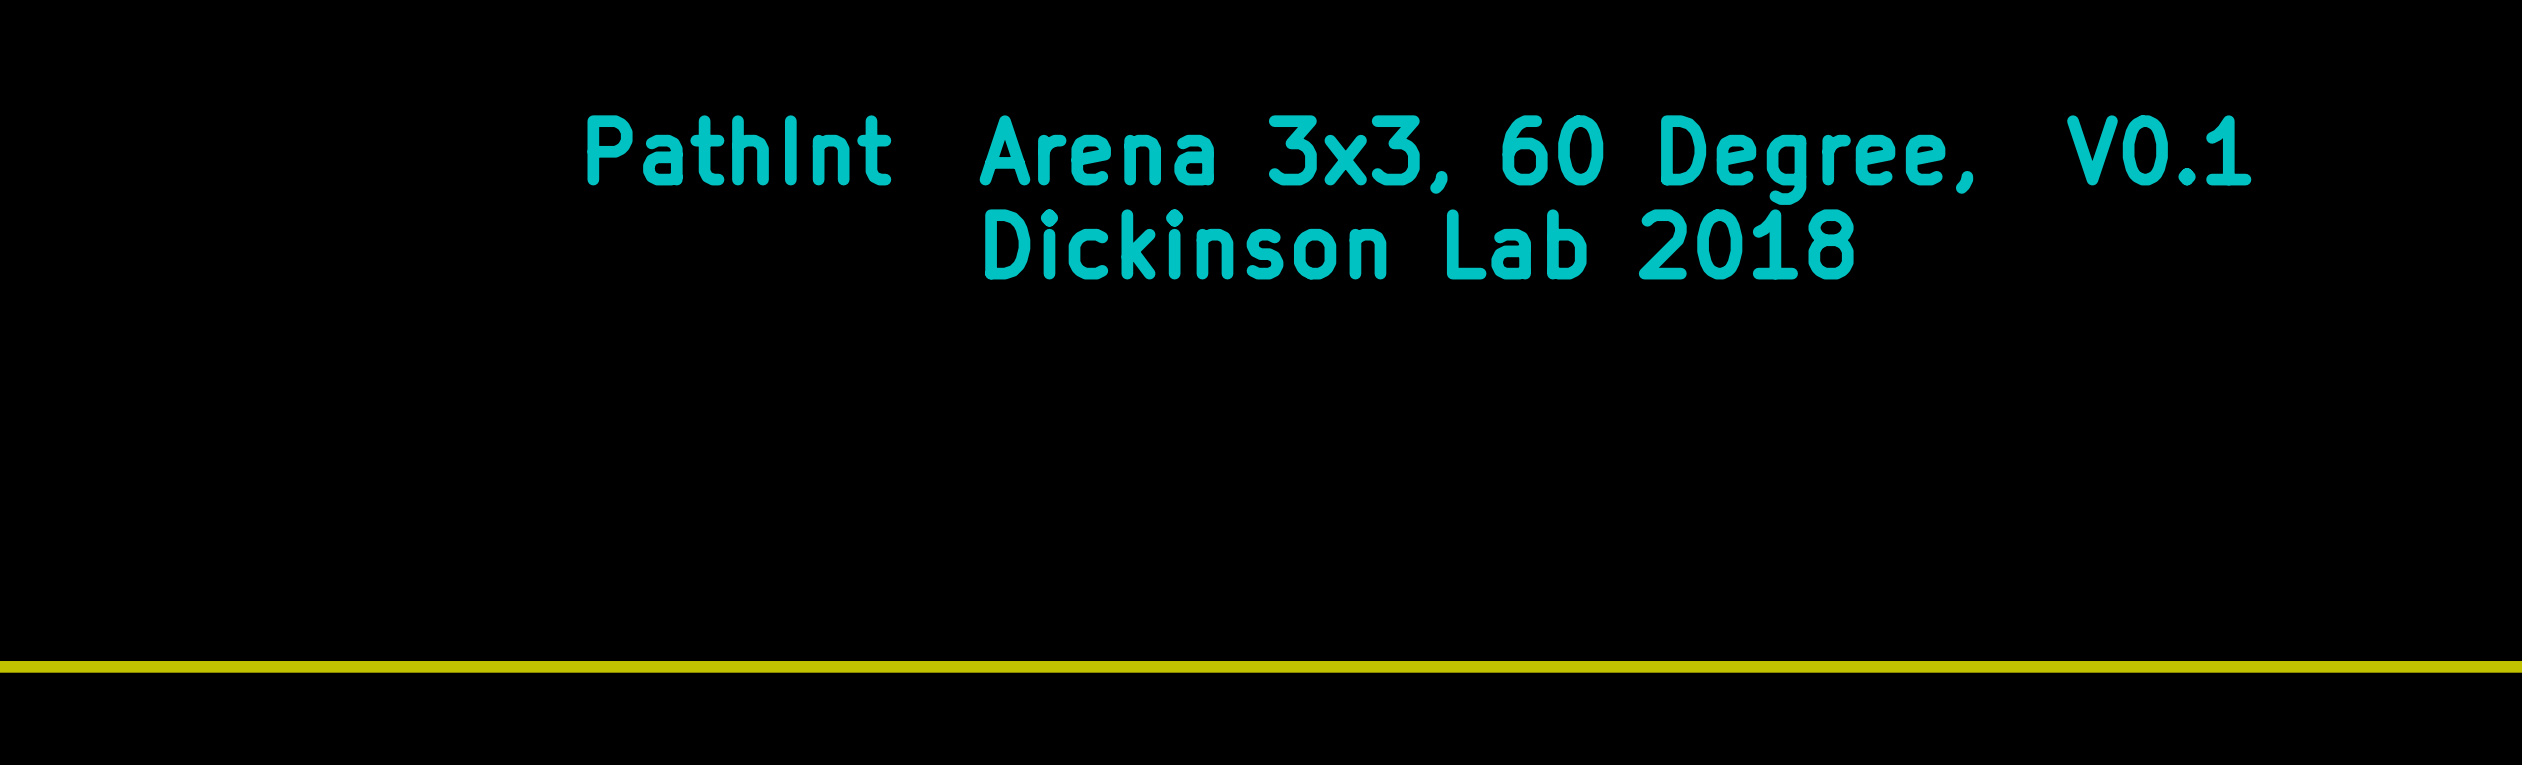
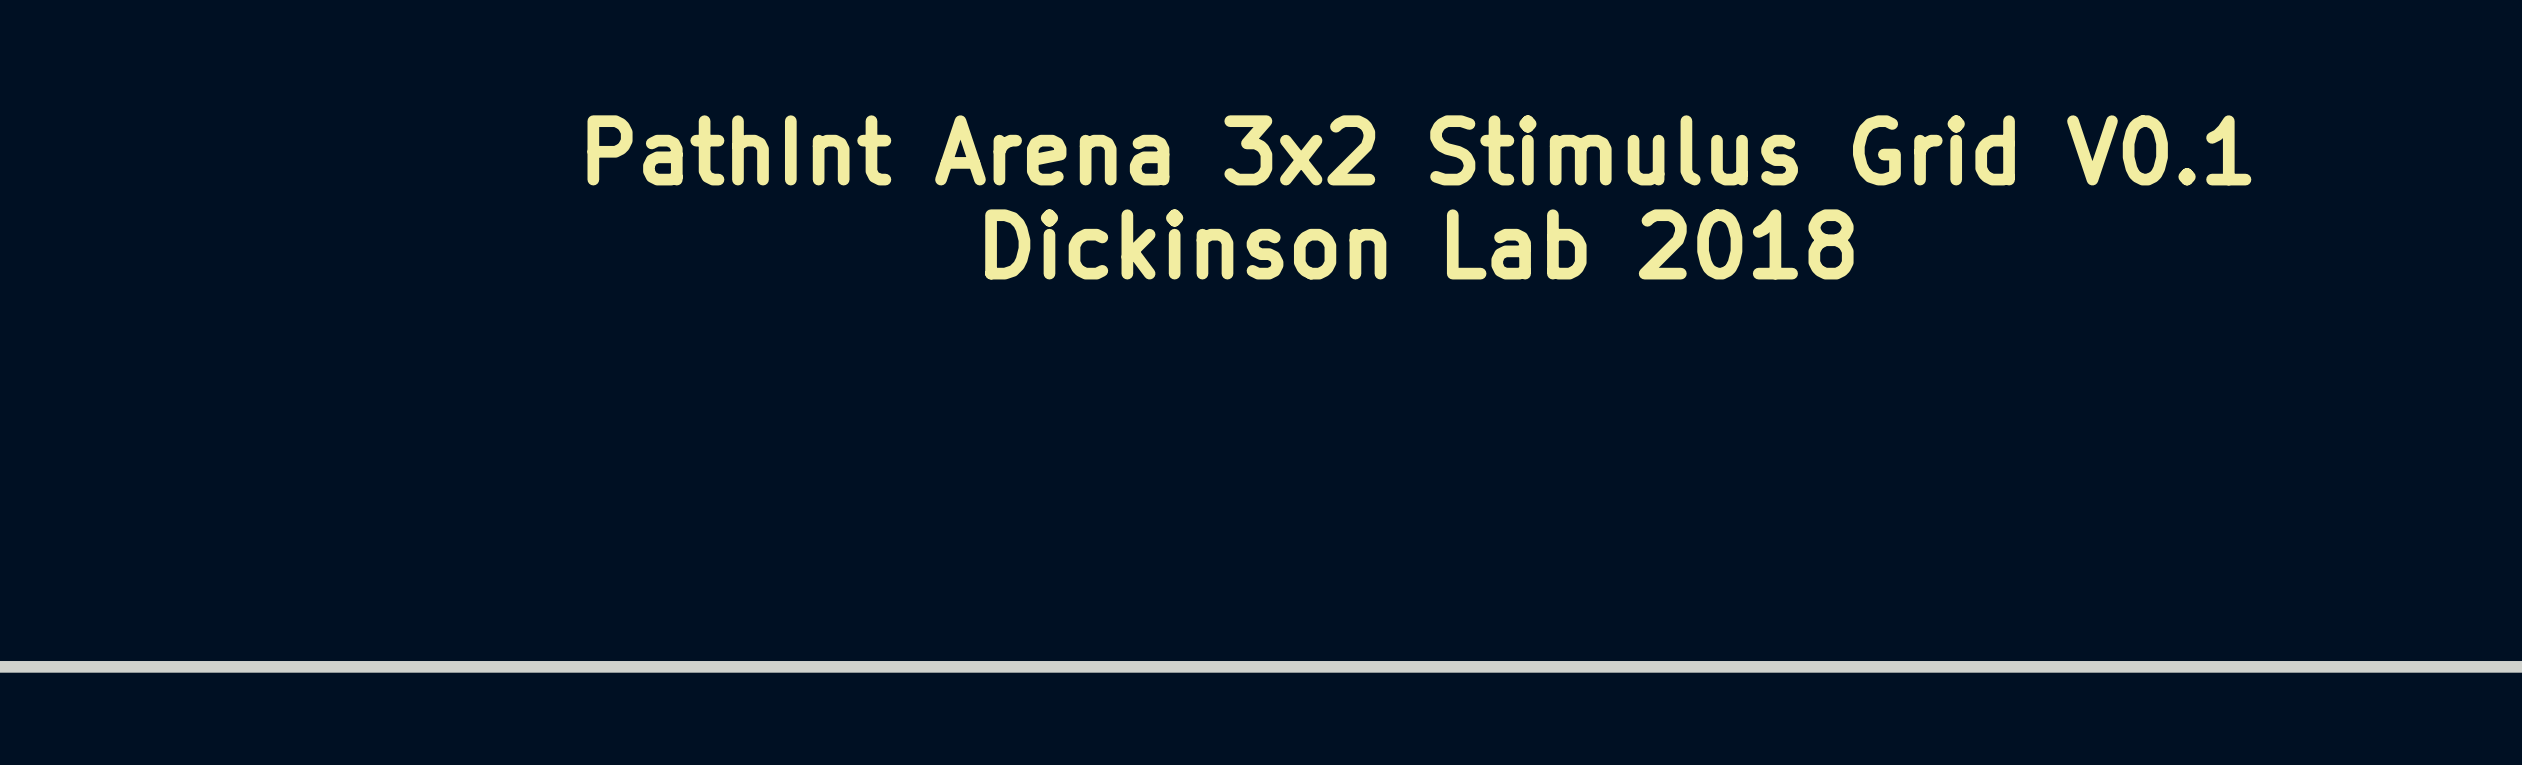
text: PathInt Arena 3x3, 60 Degree, V0.1 (1419, 160) -> PathInt Arena 3x2 Stimulus Grid V0.1 (1419, 150)

